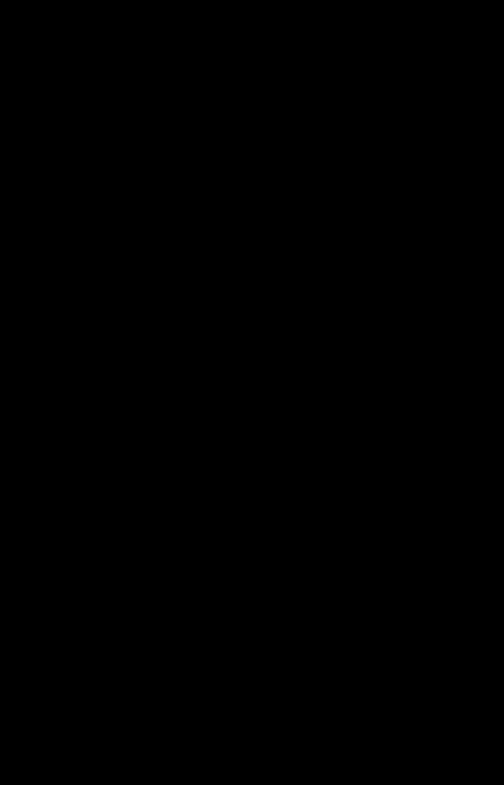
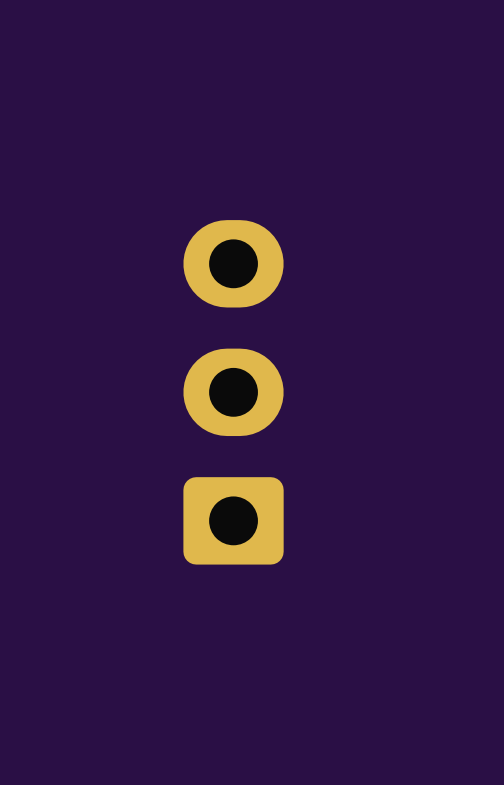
part: none -> (233, 392)

